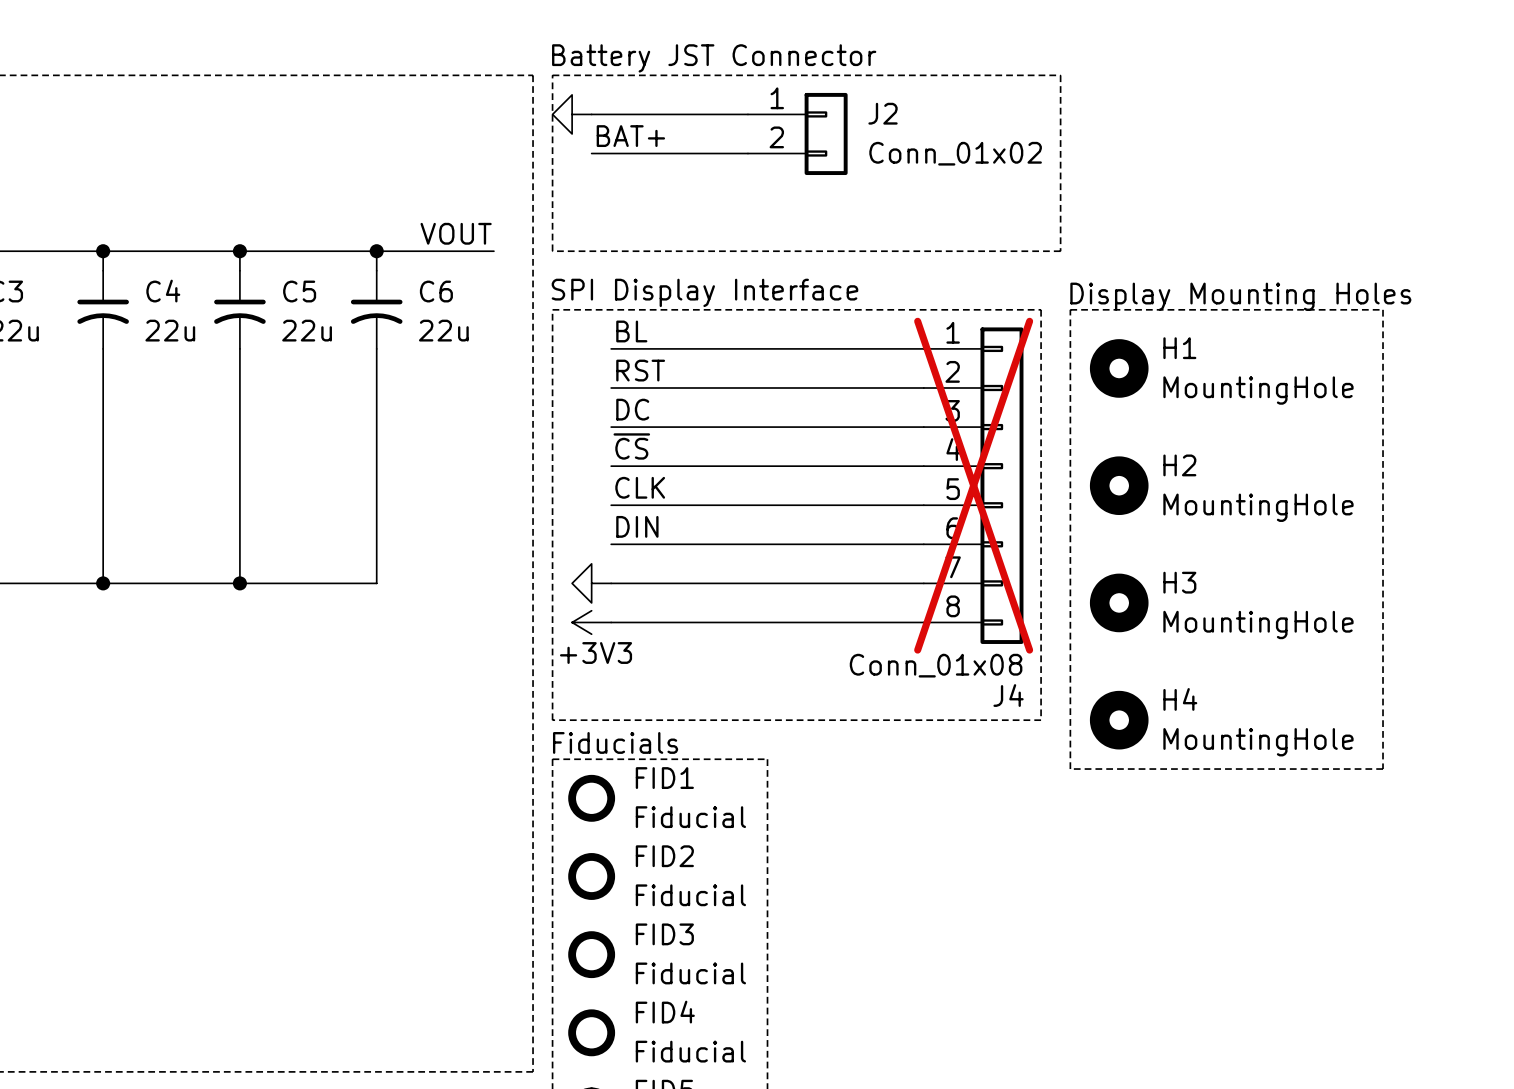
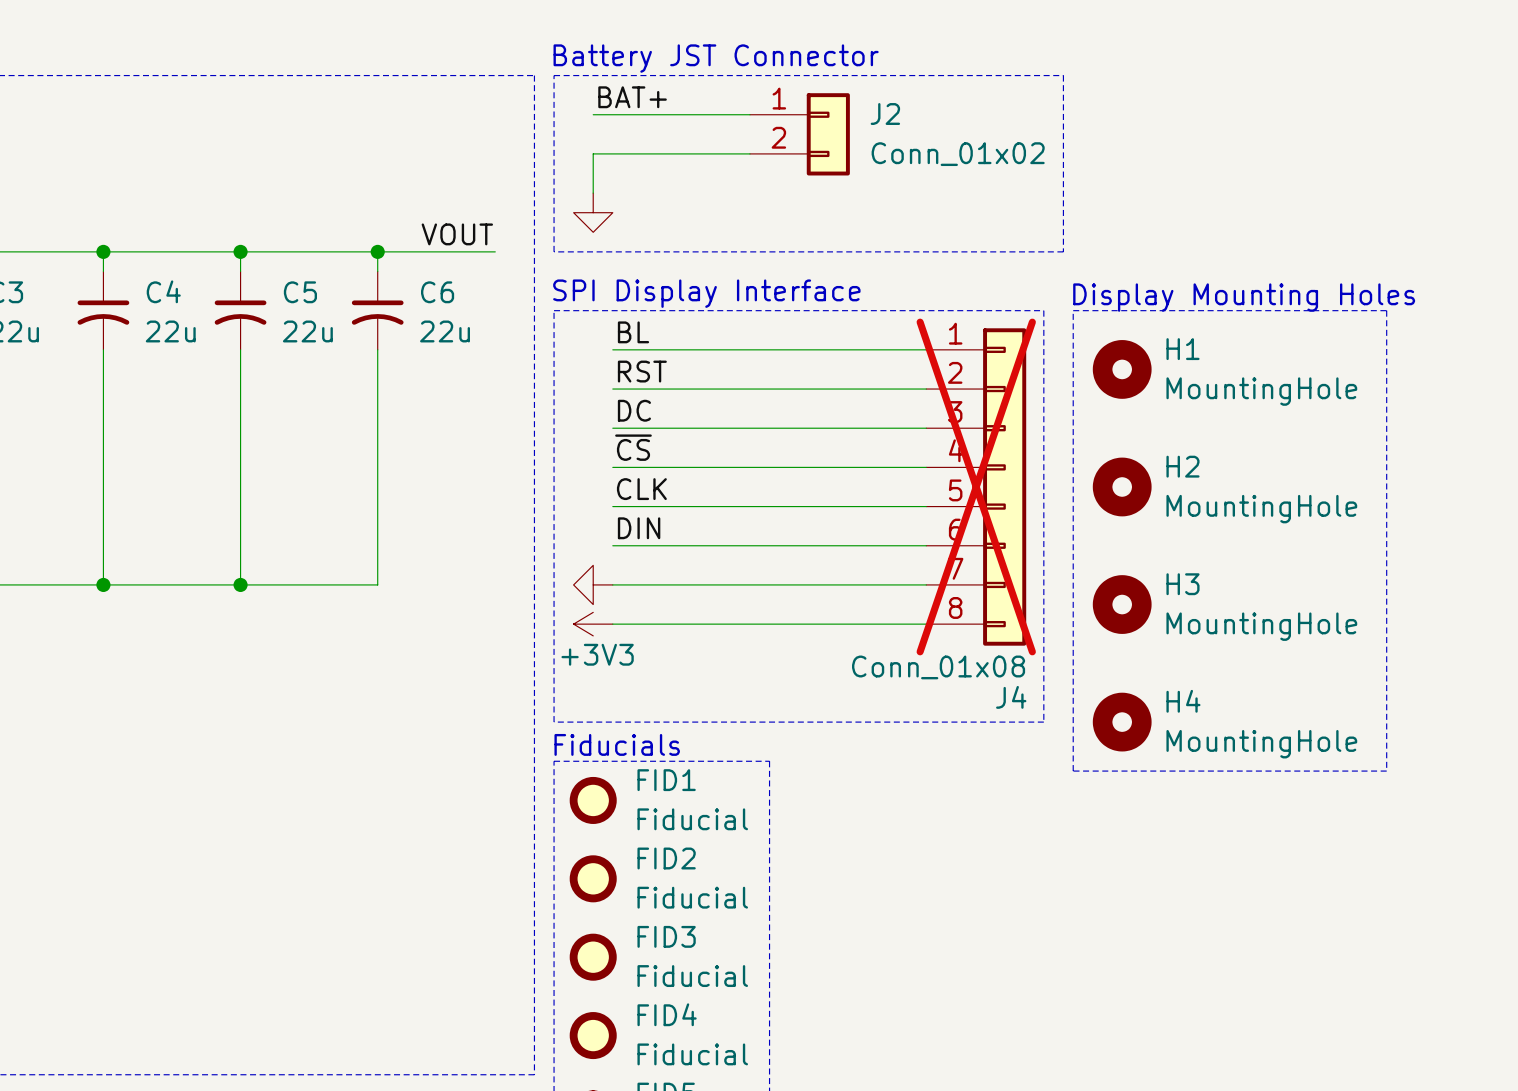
power symbol rotation: 0° (572, 114) -> 90° counterclockwise (593, 212)
power symbol position: (572, 114) -> (593, 212)
label position: BAT+ (630, 136) -> BAT+ (632, 97)
wire: none -> (593, 153) (593, 193)

